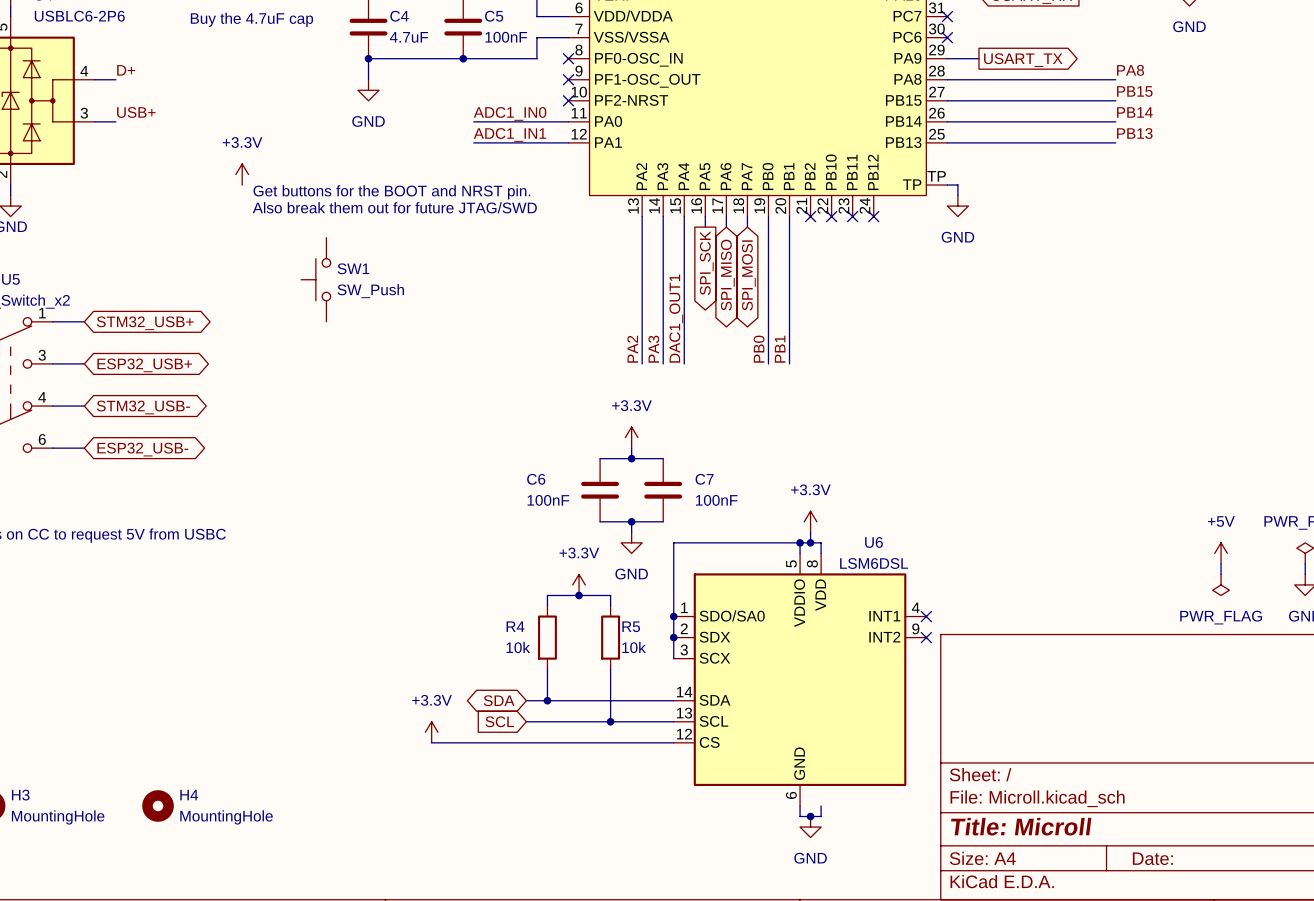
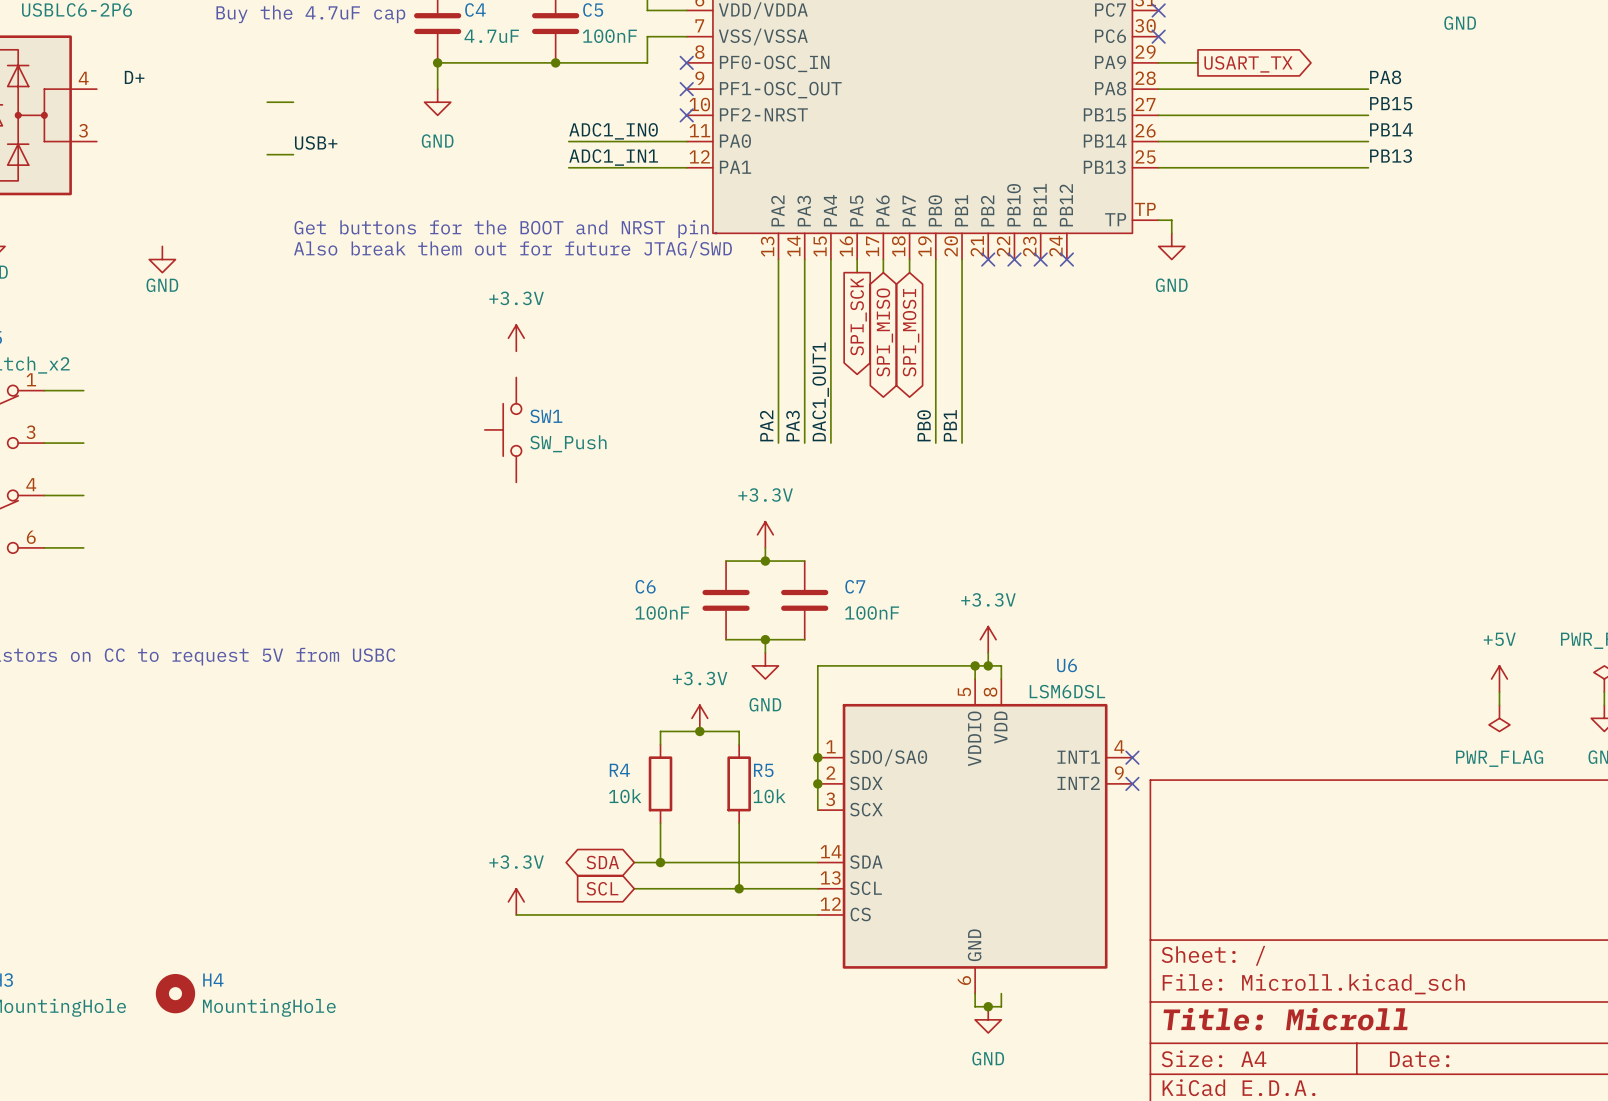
wire: (94, 79) (115, 79) -> (267, 102) (293, 102)
label position: USB+ (136, 112) -> USB+ (316, 142)
wire: (94, 121) (115, 121) -> (267, 154) (293, 154)
power symbol: +3.3V (242, 174) -> none
power symbol: none -> GND (162, 259)
SW1 position: (315, 279) -> (503, 429)
power symbol: none -> +3.3V (516, 338)
global label: STM32_USB+ (145, 323) -> none
global label: ESP32_USB+ (144, 365) -> none
global label: STM32_USB- (143, 407) -> none
global label: ESP32_USB- (142, 449) -> none

